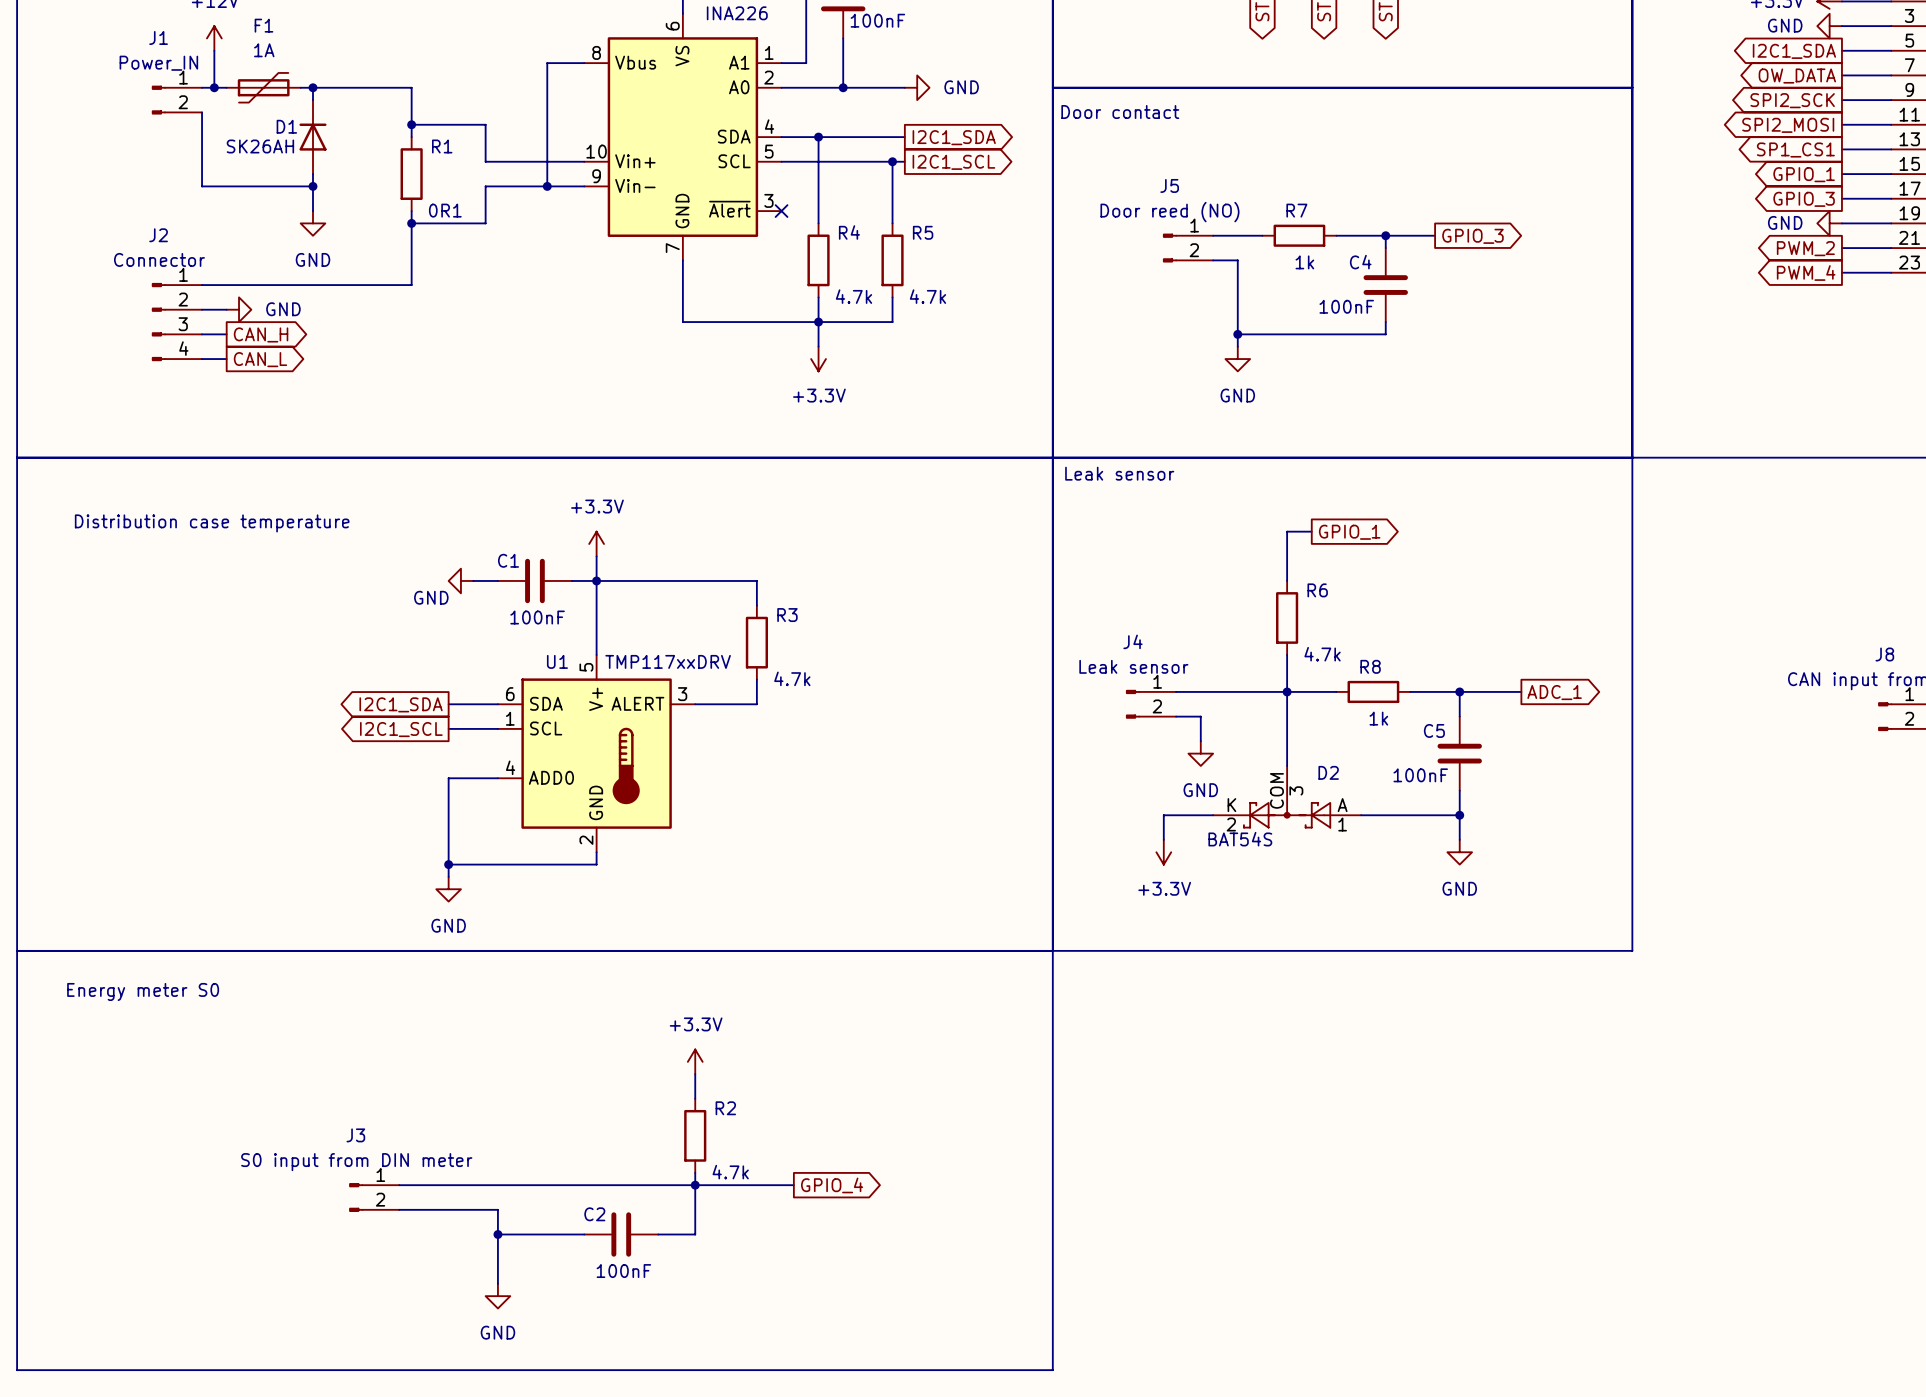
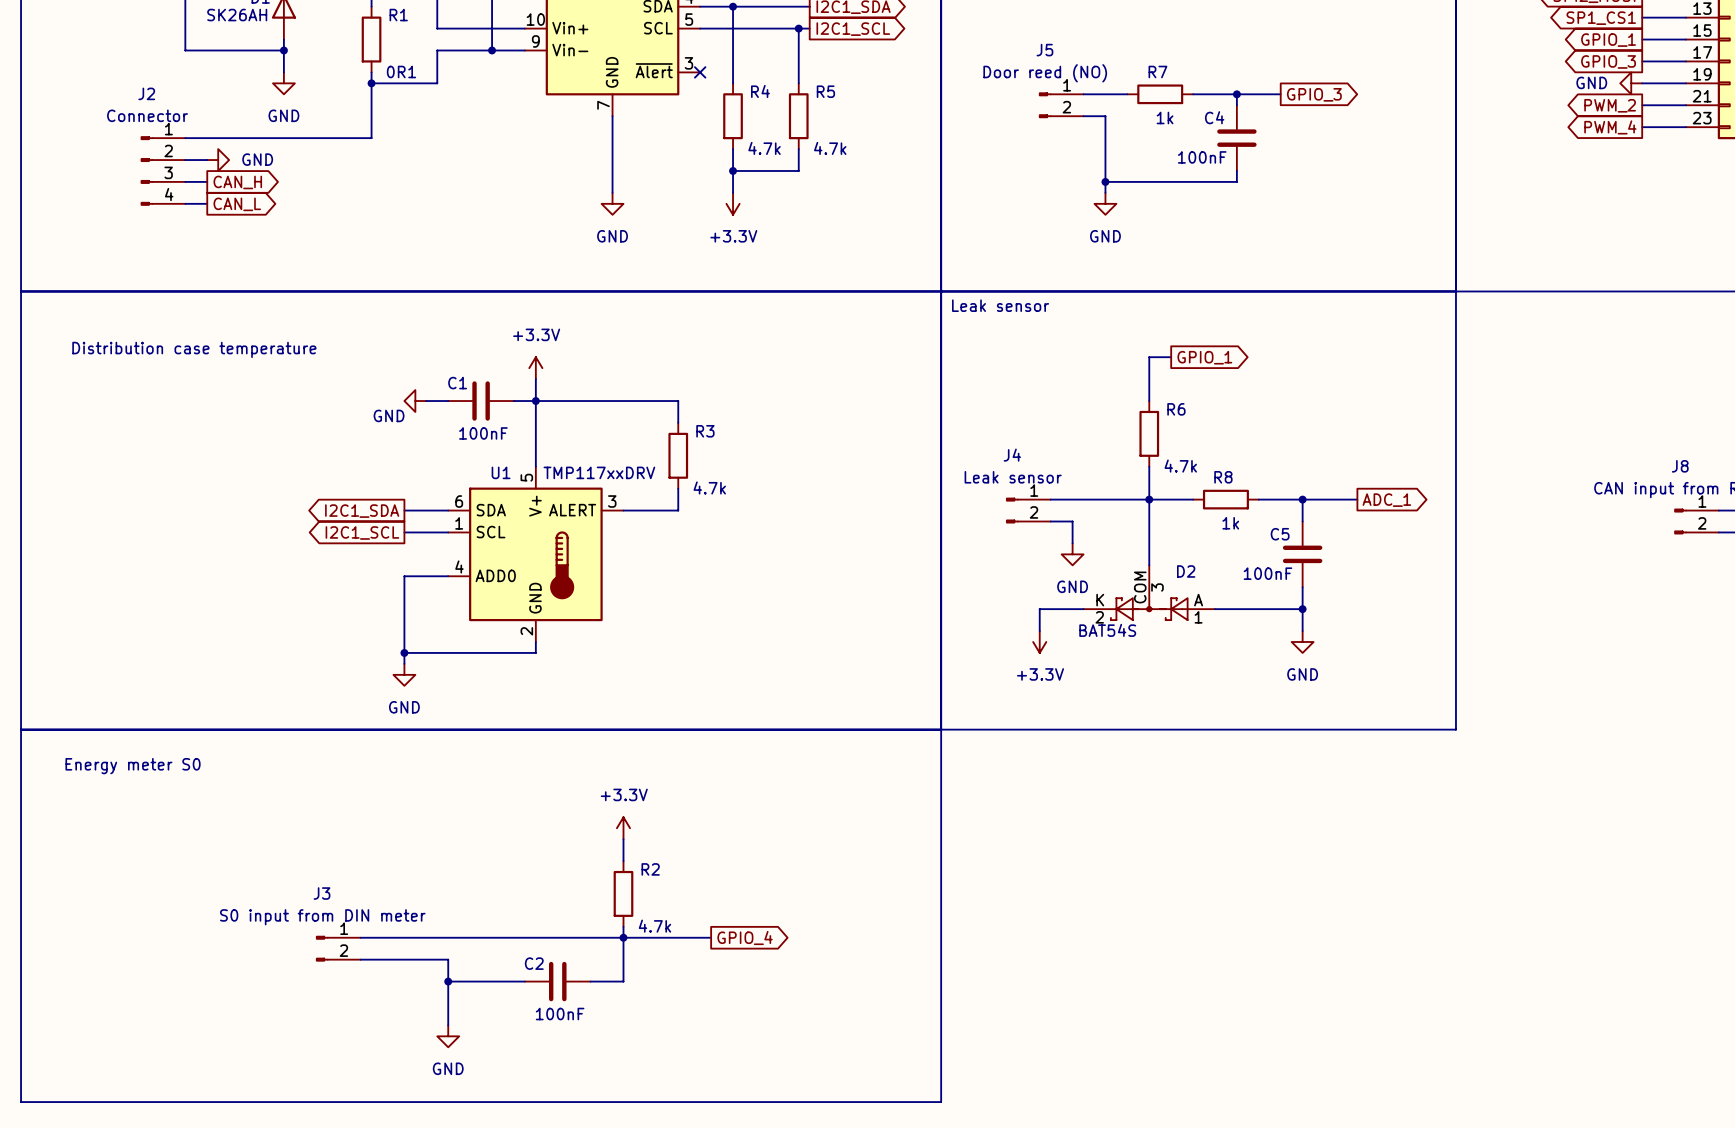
wire: (682, 322) (818, 322) -> (612, 170) (612, 192)
power symbol: none -> GND (612, 203)

